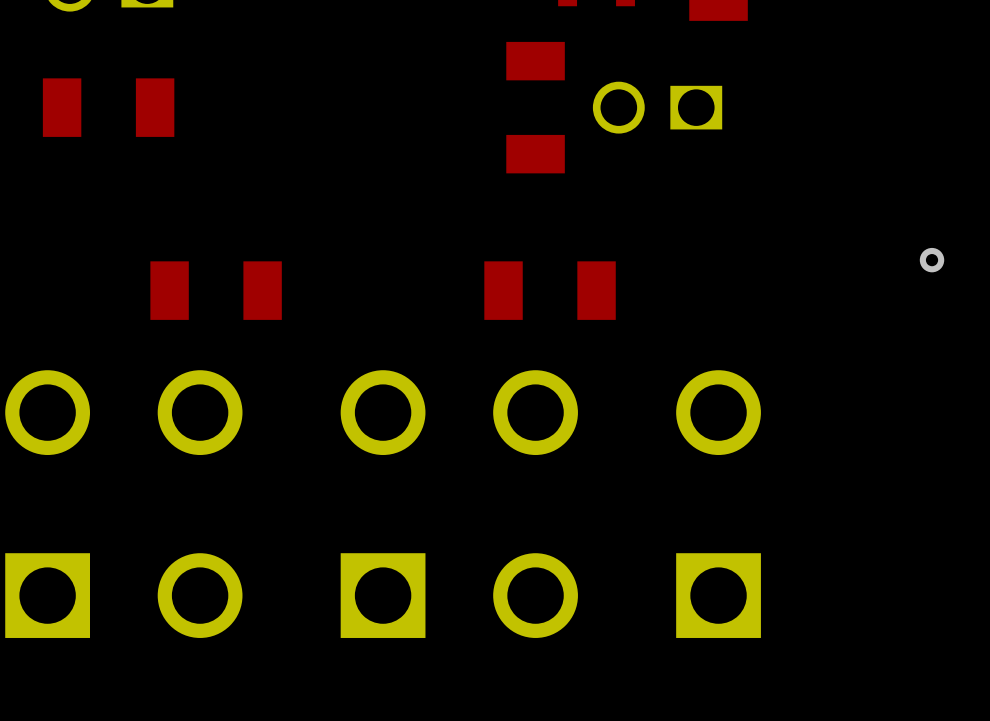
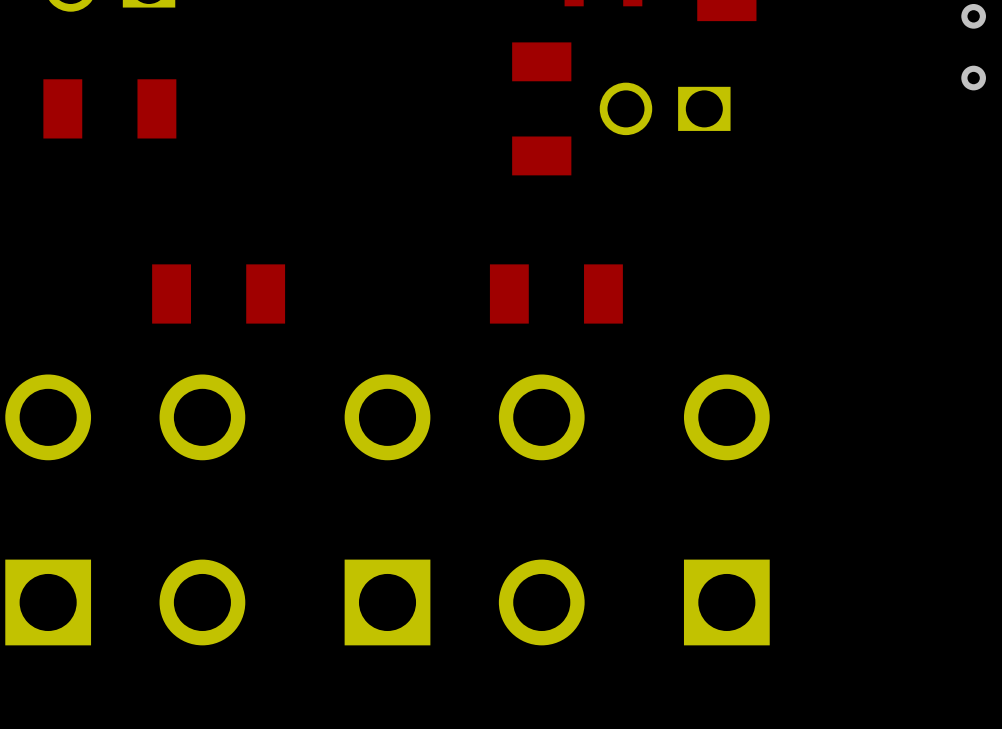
via: none -> (973, 16)
via: none -> (973, 78)
via: (932, 260) -> none

